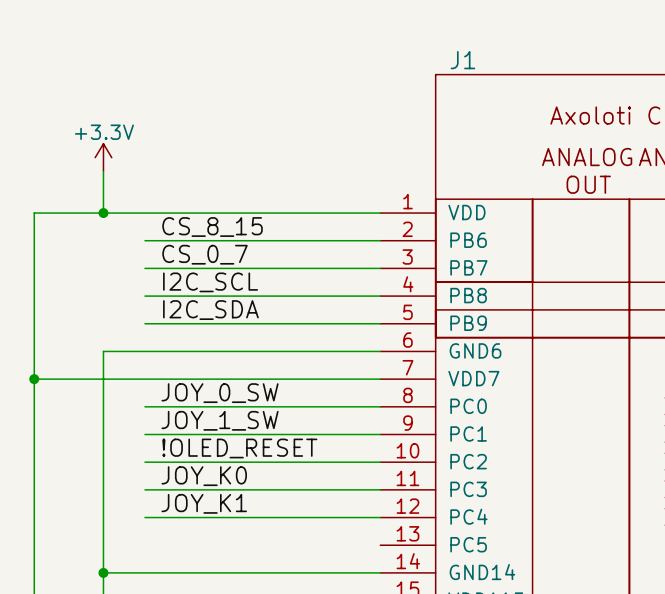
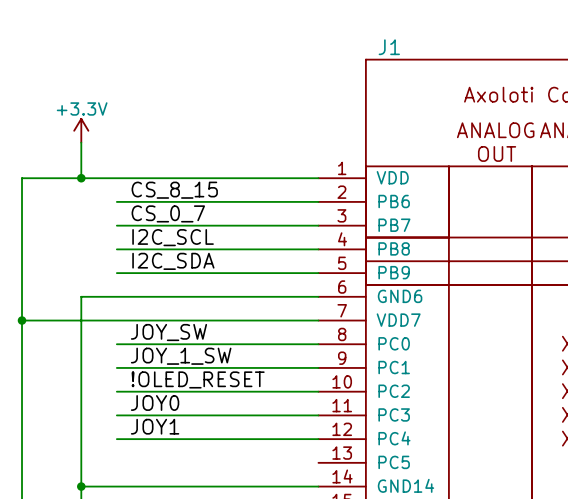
label: JOY_0_SW (220, 393) -> JOY_SW (168, 332)
label: JOY_K0 (204, 476) -> JOY0 (155, 402)
label: JOY_K1 (204, 503) -> JOY1 (155, 426)

